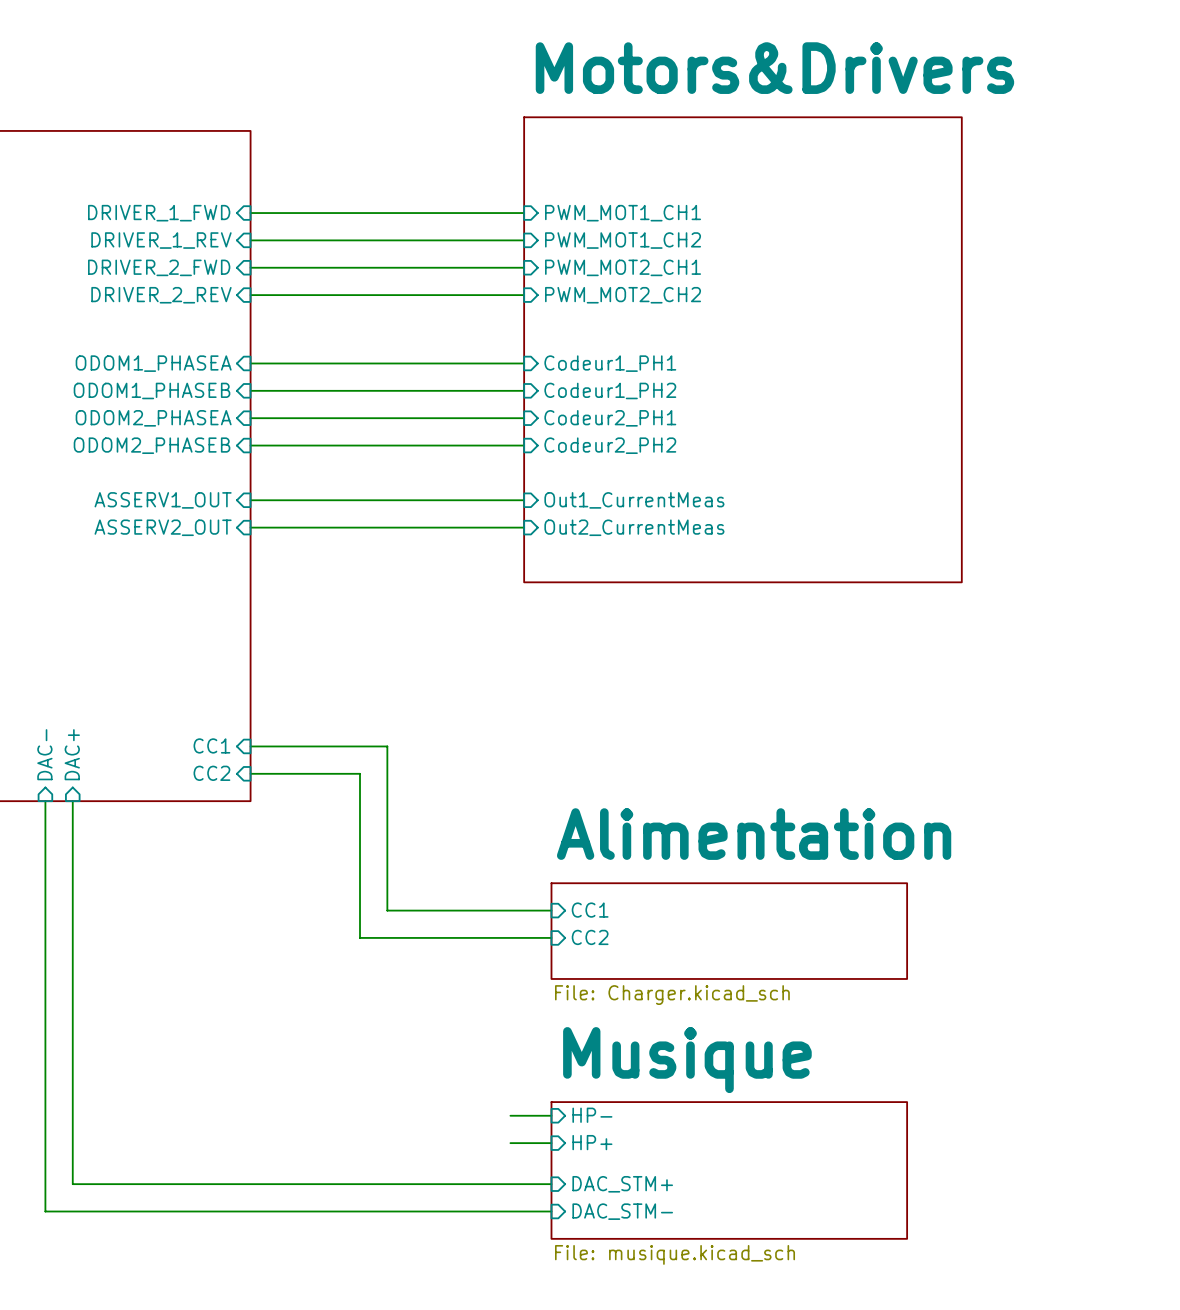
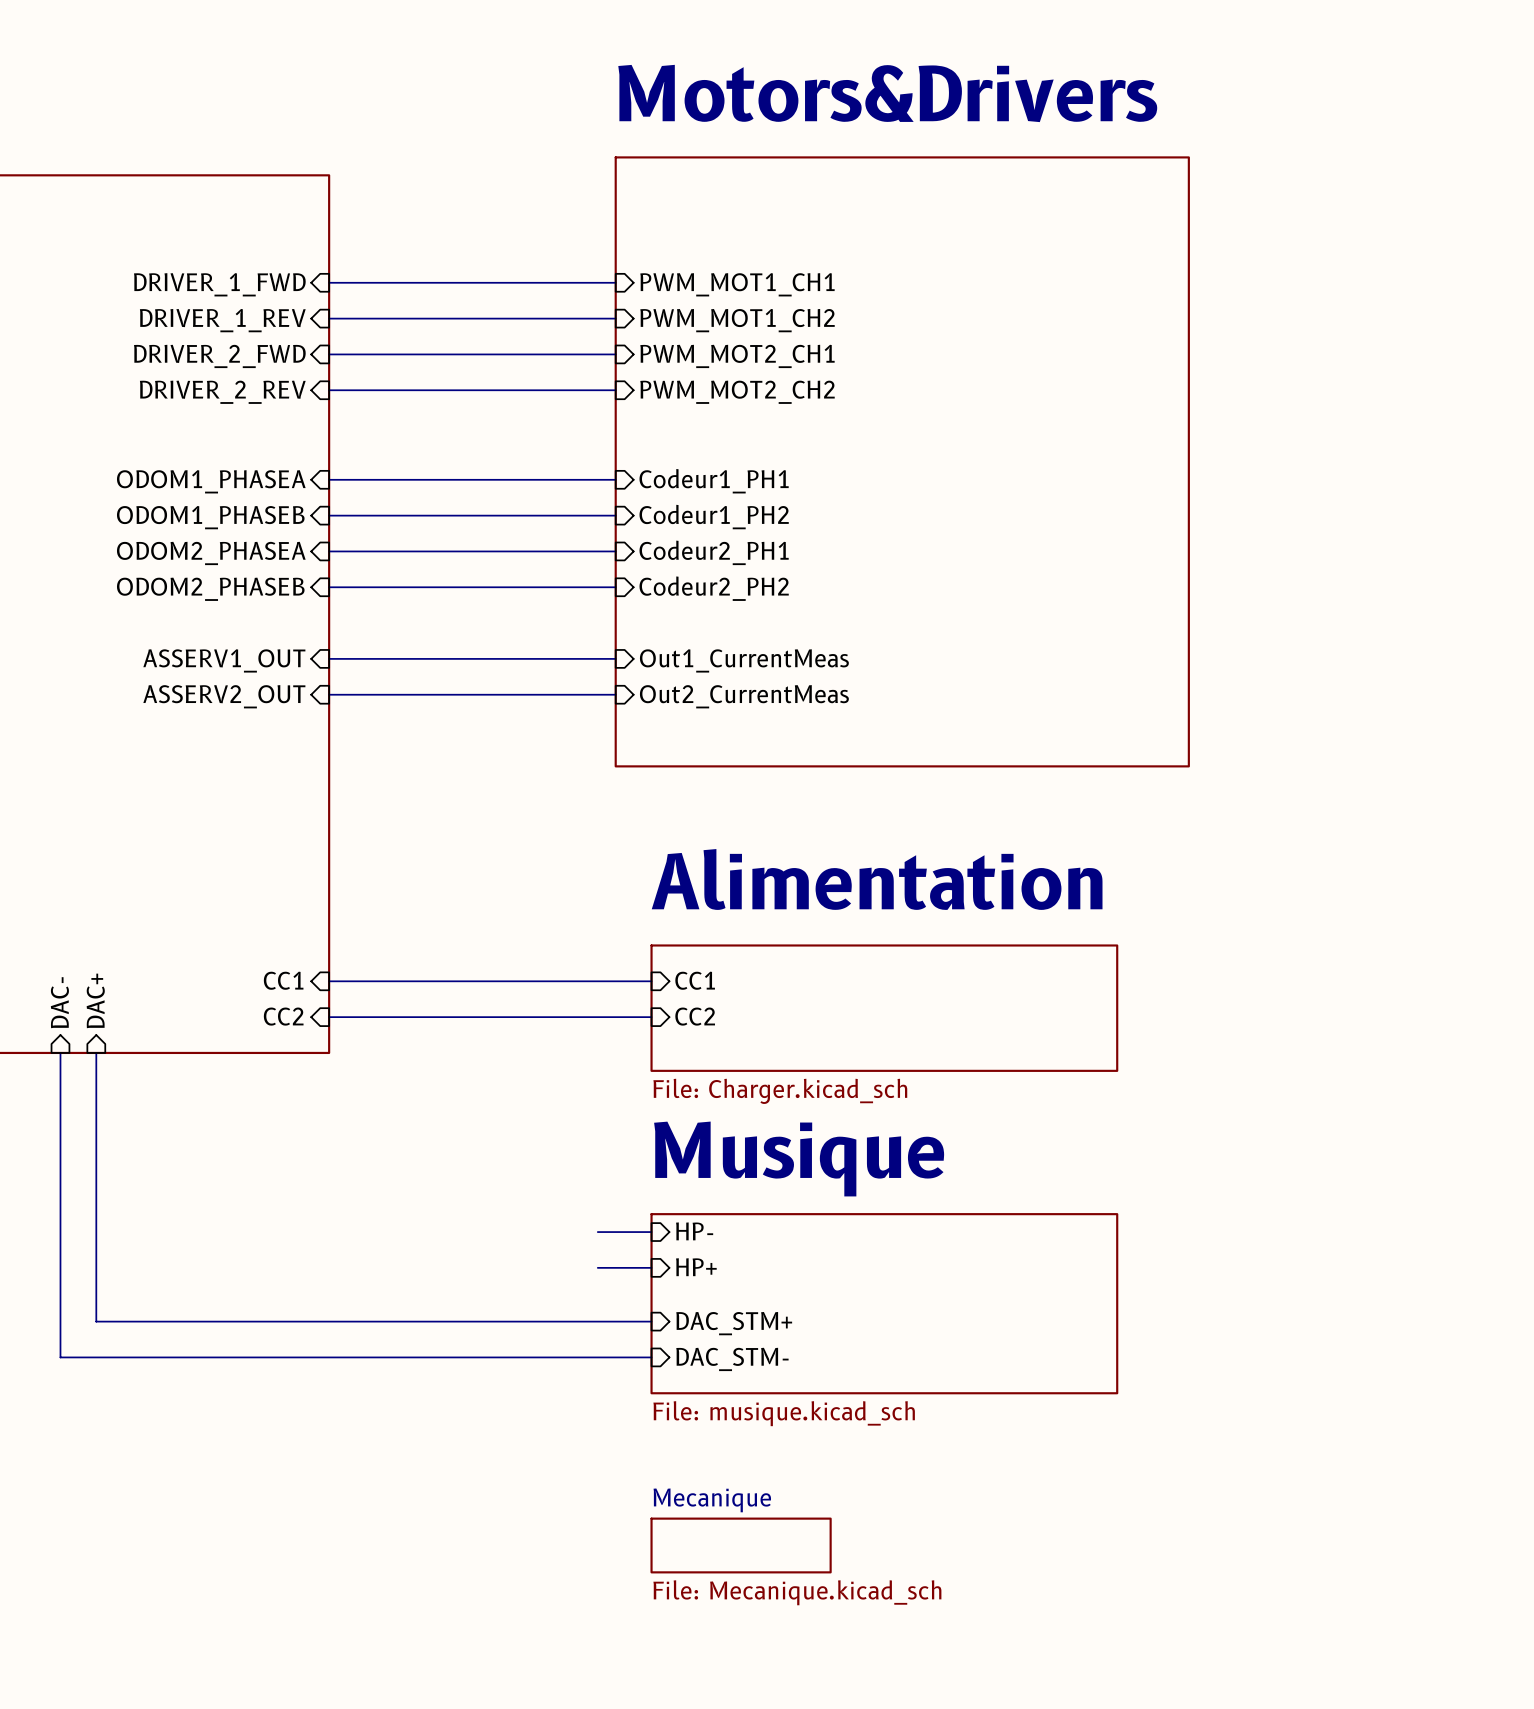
wire: (469, 213) (524, 213) -> none
sheet pin position: PWM_MOT1_CH1 (623, 213) -> PWM_MOT1_CH1 (737, 284)
wire: (469, 240) (524, 240) -> none
sheet pin position: PWM_MOT1_CH2 (623, 240) -> PWM_MOT1_CH2 (737, 320)
wire: (469, 267) (524, 267) -> none
sheet pin position: PWM_MOT2_CH1 (623, 267) -> PWM_MOT2_CH1 (737, 356)
wire: (469, 295) (524, 295) -> none
sheet pin position: PWM_MOT2_CH2 (623, 295) -> PWM_MOT2_CH2 (737, 392)
sheet Motors&Drivers position: (742, 349) -> (902, 461)
wire: (469, 363) (524, 363) -> none
sheet pin position: Codeur1_PH1 (610, 363) -> Codeur1_PH1 (714, 481)
wire: (469, 390) (524, 390) -> none
sheet pin position: Codeur1_PH2 (610, 390) -> Codeur1_PH2 (714, 517)
wire: (469, 418) (524, 418) -> none
sheet pin position: Codeur2_PH1 (610, 418) -> Codeur2_PH1 (714, 552)
wire: (469, 445) (524, 445) -> none
sheet pin position: Codeur2_PH2 (610, 445) -> Codeur2_PH2 (714, 588)
wire: (469, 500) (524, 500) -> none
sheet pin position: Out1_CurrentMeas (634, 500) -> Out1_CurrentMeas (744, 660)
wire: (469, 527) (524, 527) -> none
sheet pin position: Out2_CurrentMeas (634, 527) -> Out2_CurrentMeas (744, 696)
wire: (387, 746) (387, 910) (551, 910) -> (508, 981) (651, 981)
wire: (360, 773) (360, 937) (455, 937) -> (472, 1017) (651, 1017)
sheet pin position: CC1 (590, 910) -> CC1 (695, 980)
sheet Alimentation position: (729, 931) -> (884, 1008)
wire: (496, 937) (551, 937) -> none
sheet pin position: CC2 (590, 937) -> CC2 (695, 1016)
wire: (72, 1006) (72, 1184) (551, 1184) -> (96, 1321) (651, 1321)
wire: (45, 1033) (45, 1211) (551, 1211) -> (60, 1357) (651, 1357)
wire: (510, 1115) (551, 1115) -> (597, 1267) (651, 1267)
sheet pin position: HP- (592, 1115) -> HP- (694, 1231)
sheet pin position: HP+ (592, 1142) -> HP+ (696, 1267)
wire: (510, 1143) (551, 1143) -> none
sheet Musique position: (729, 1170) -> (884, 1303)
sheet Mecanique: none -> File: Mecanique.kicad_sch (741, 1545)
sheet pin position: DAC_STM+ (622, 1184) -> DAC_STM+ (734, 1323)
sheet pin position: DAC_STM- (622, 1211) -> DAC_STM- (732, 1359)

